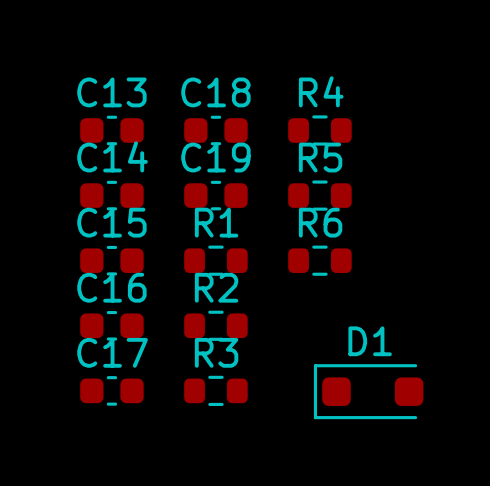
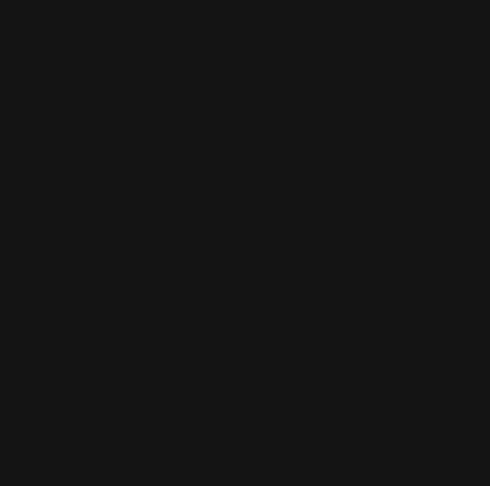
C13: (111, 130) -> none
C18: (215, 130) -> none
R4: (319, 130) -> none
C14: (111, 195) -> none
C19: (215, 195) -> none
R5: (319, 195) -> none
C15: (111, 260) -> none
R1: (215, 260) -> none
R6: (319, 260) -> none
C16: (111, 325) -> none
R2: (215, 325) -> none
C17: (111, 390) -> none
R3: (215, 390) -> none
D1: (368, 391) -> none

